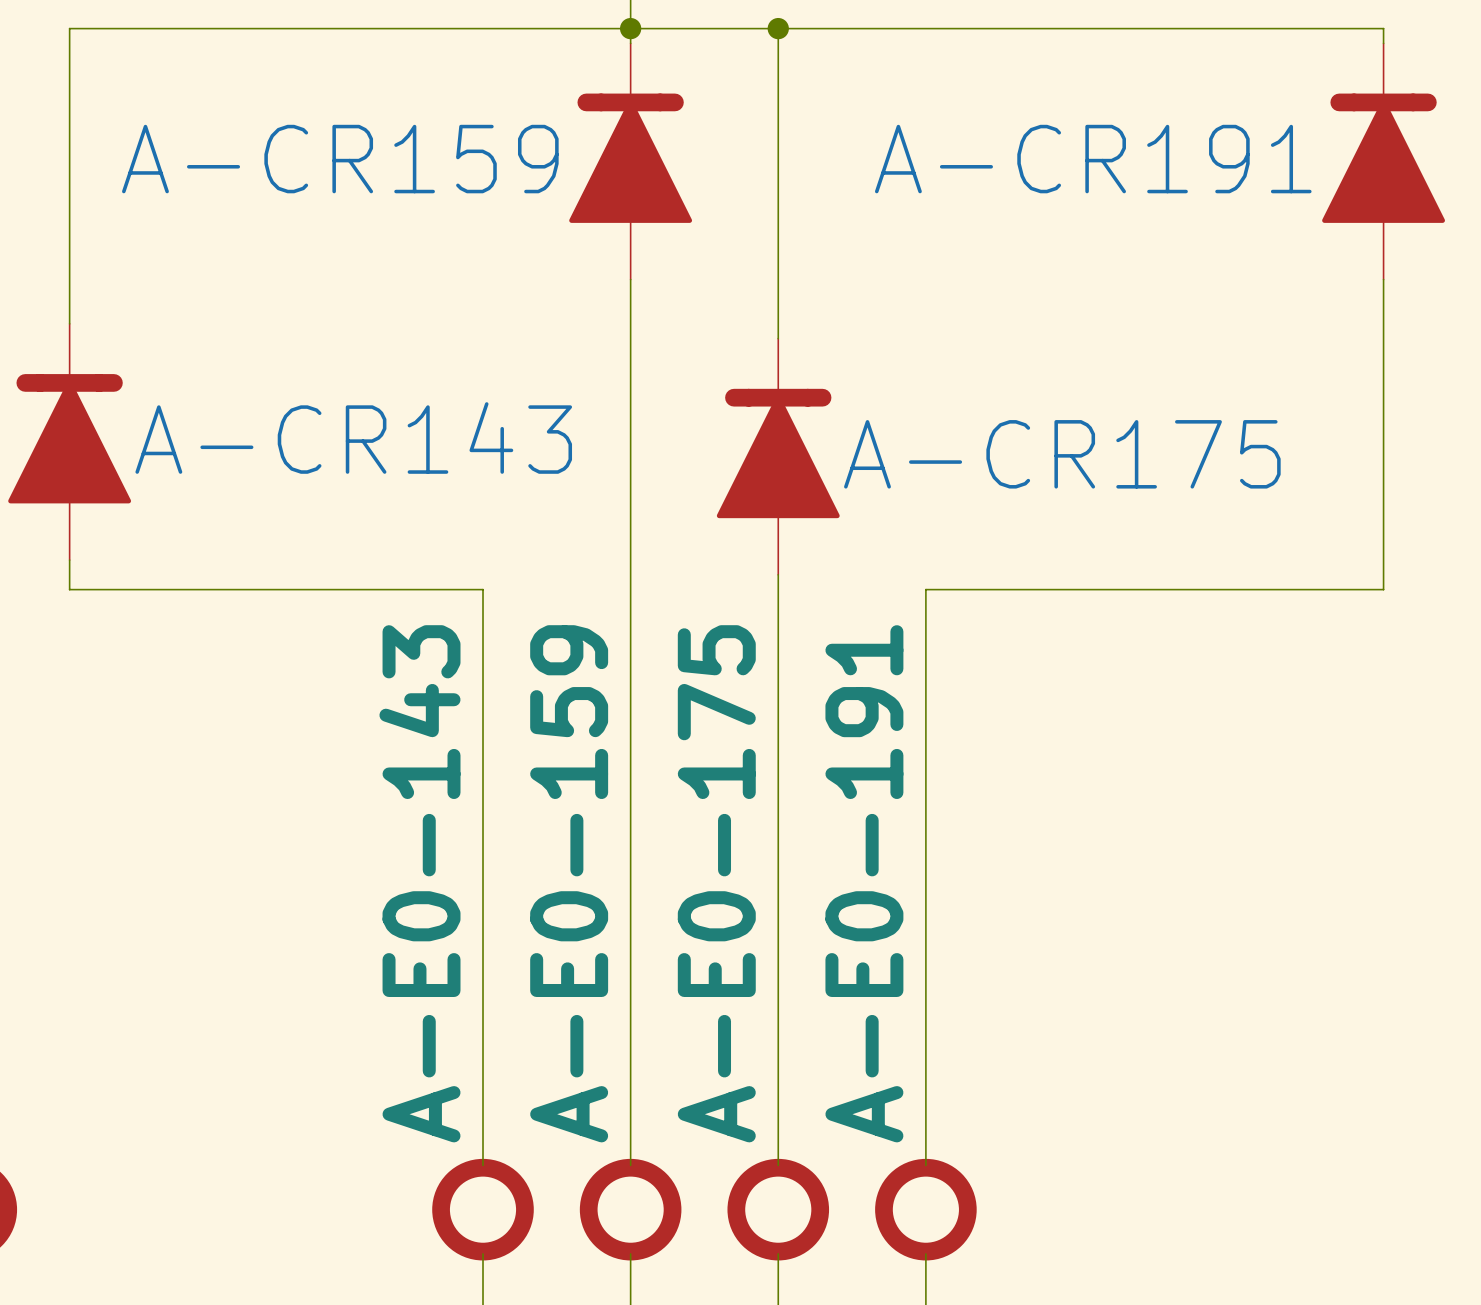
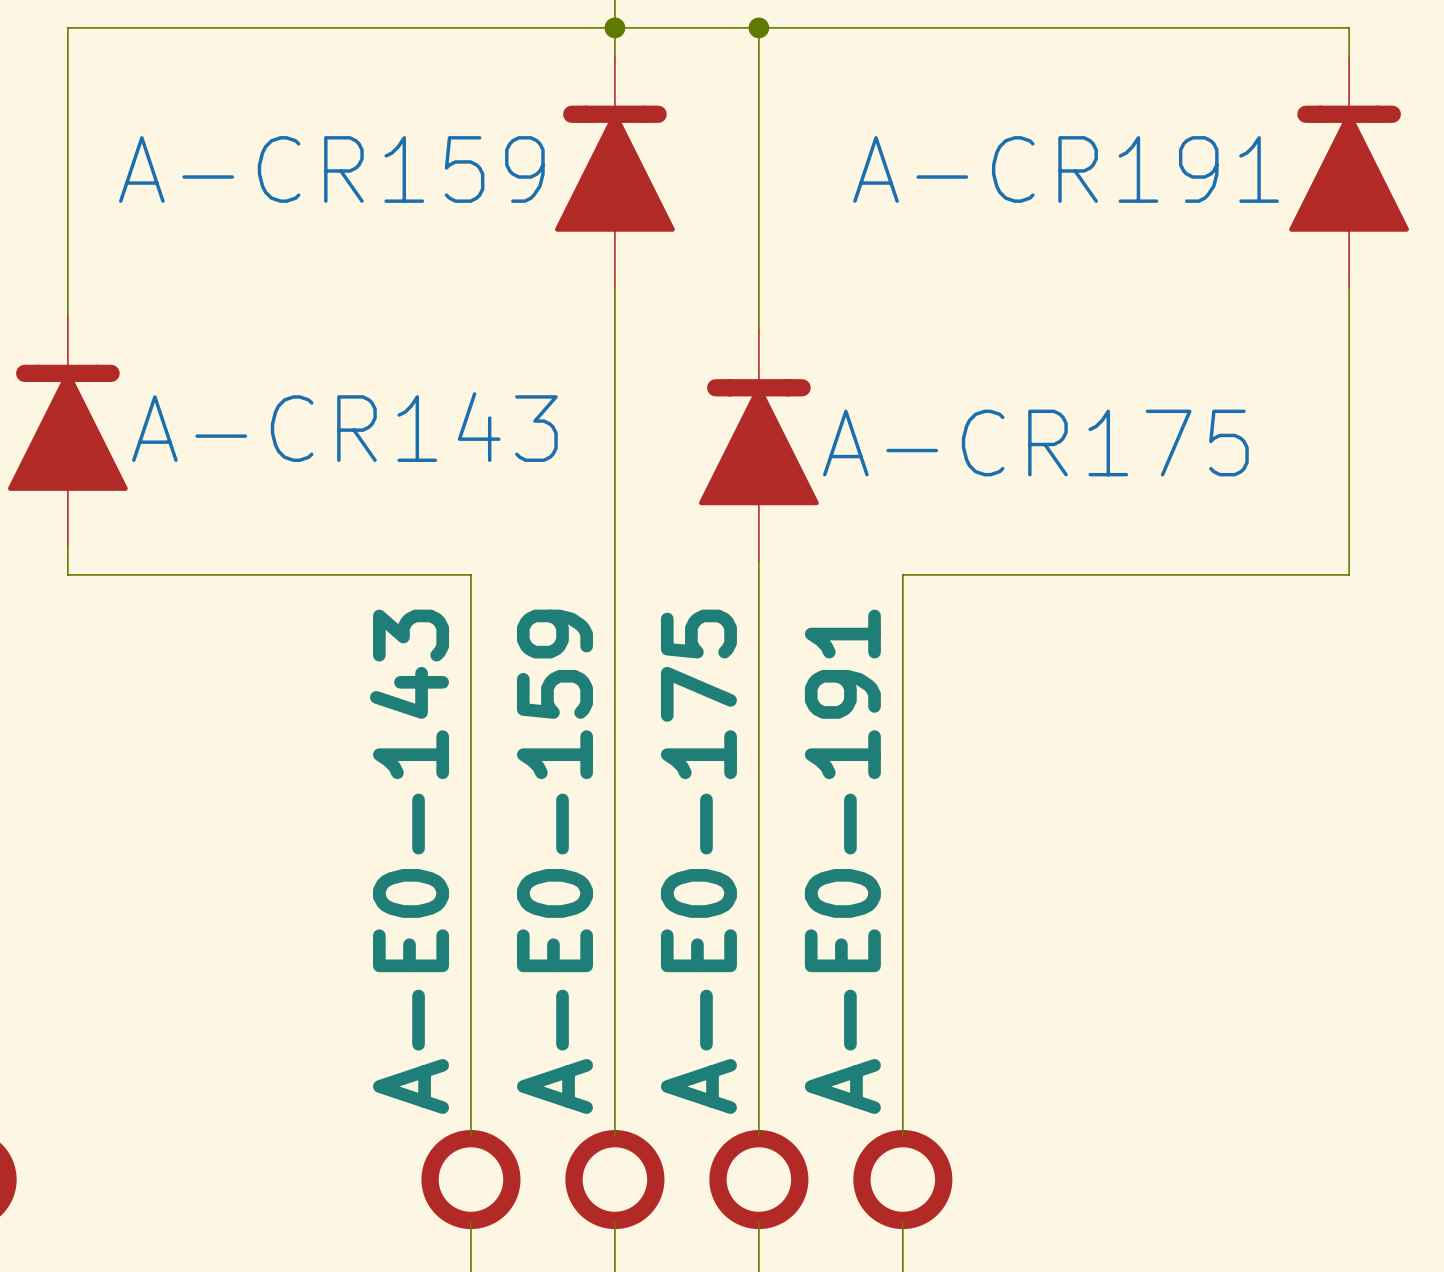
A-CR159 position: (630, 161) -> (614, 171)
A-CR191 position: (1383, 161) -> (1349, 171)

